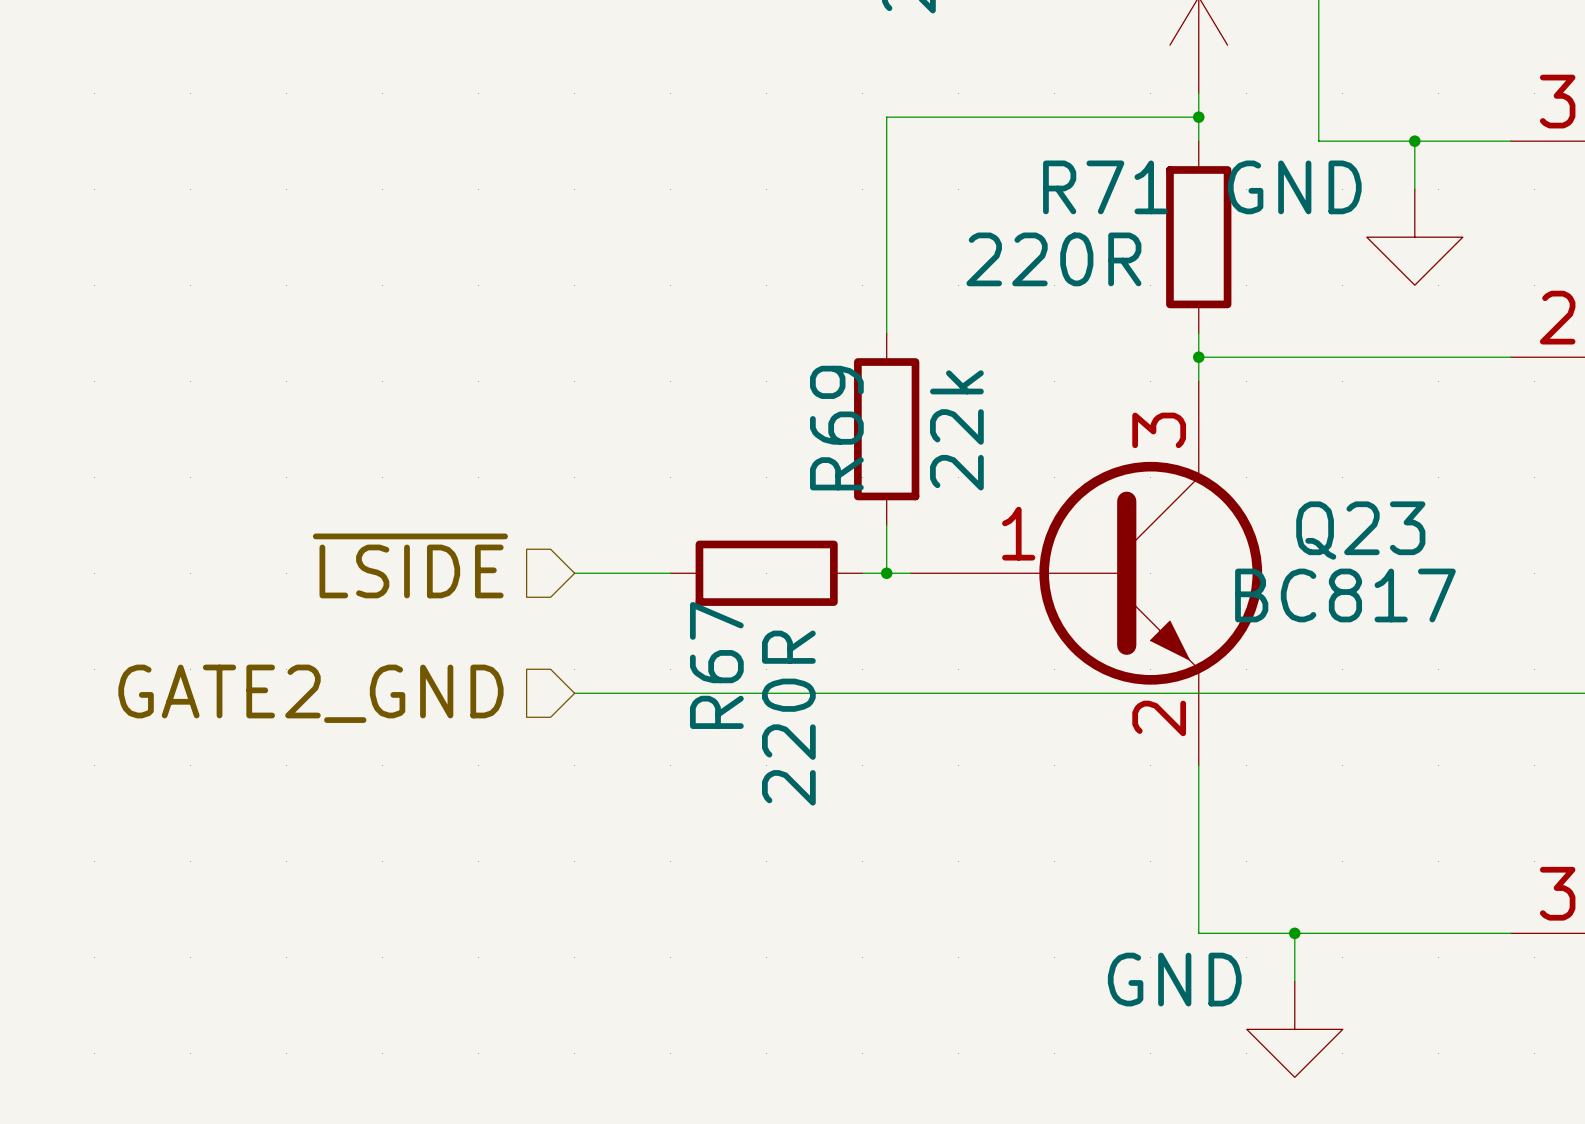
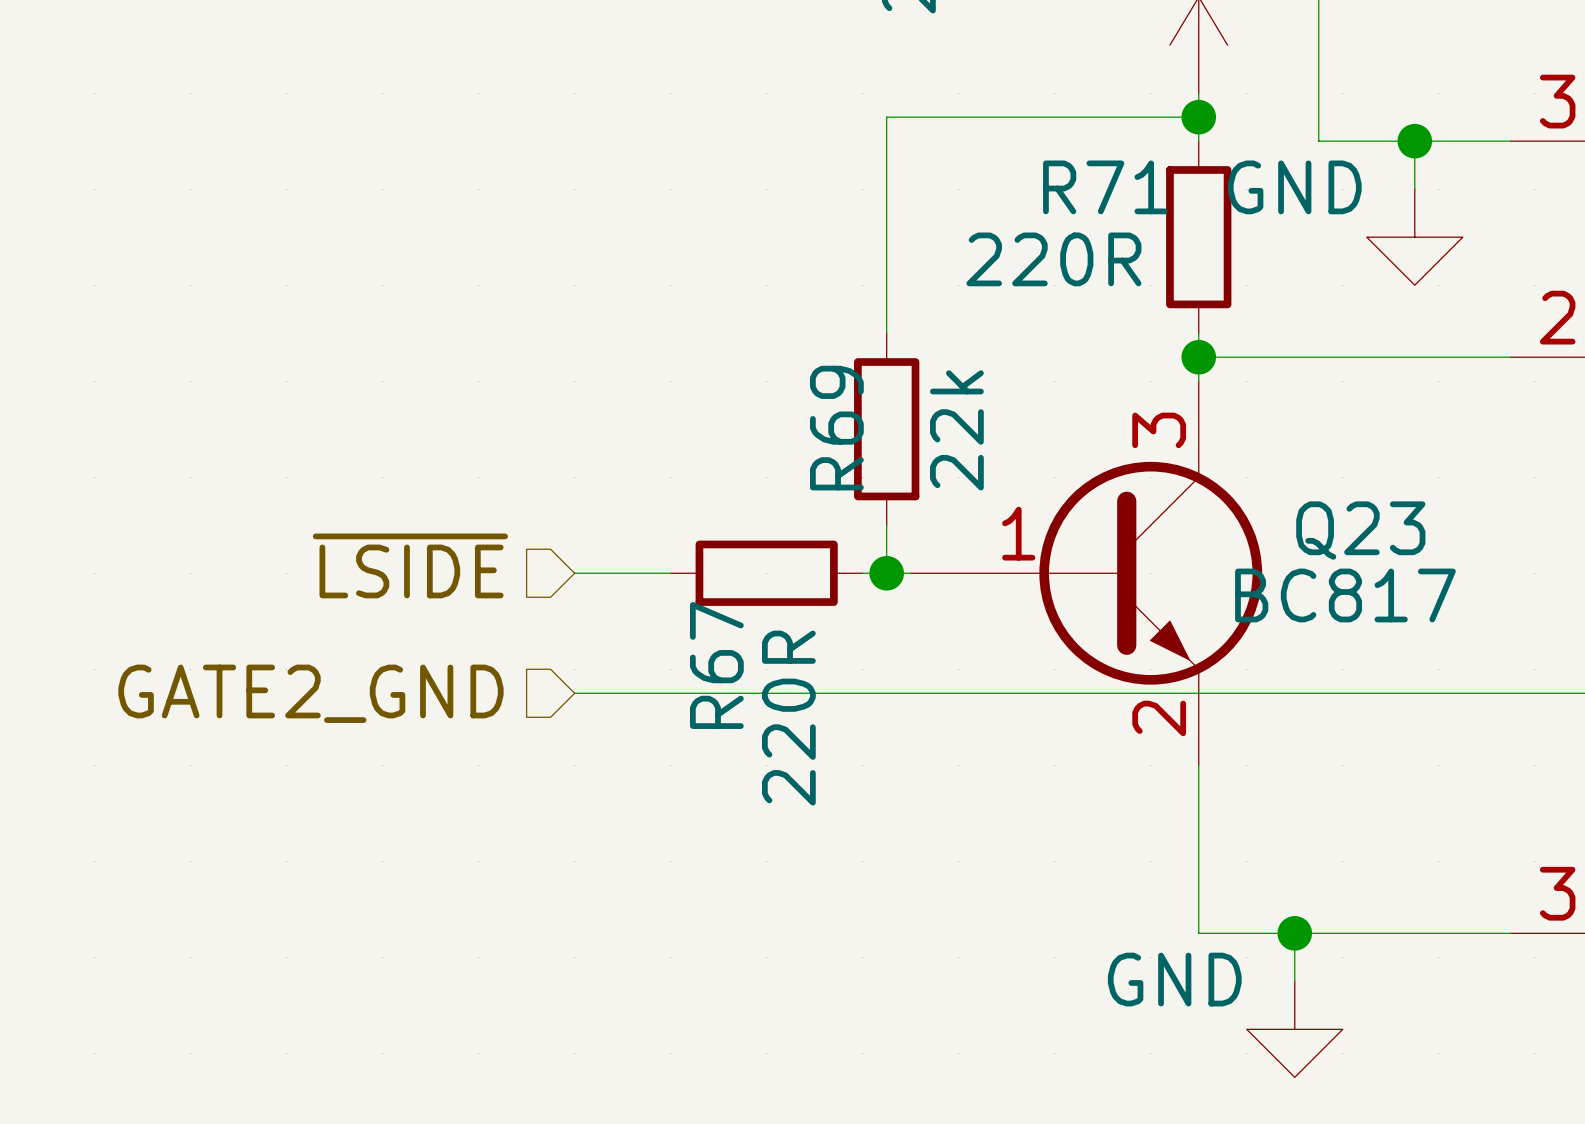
junction size: [1193, 111, 1205, 123] -> [1181, 99, 1217, 135]
junction size: [1409, 135, 1421, 147] -> [1397, 123, 1433, 159]
junction size: [1193, 351, 1205, 363] -> [1181, 339, 1217, 375]
junction size: [880, 567, 893, 580] -> [869, 555, 904, 591]
junction size: [1289, 927, 1301, 940] -> [1277, 916, 1313, 951]

